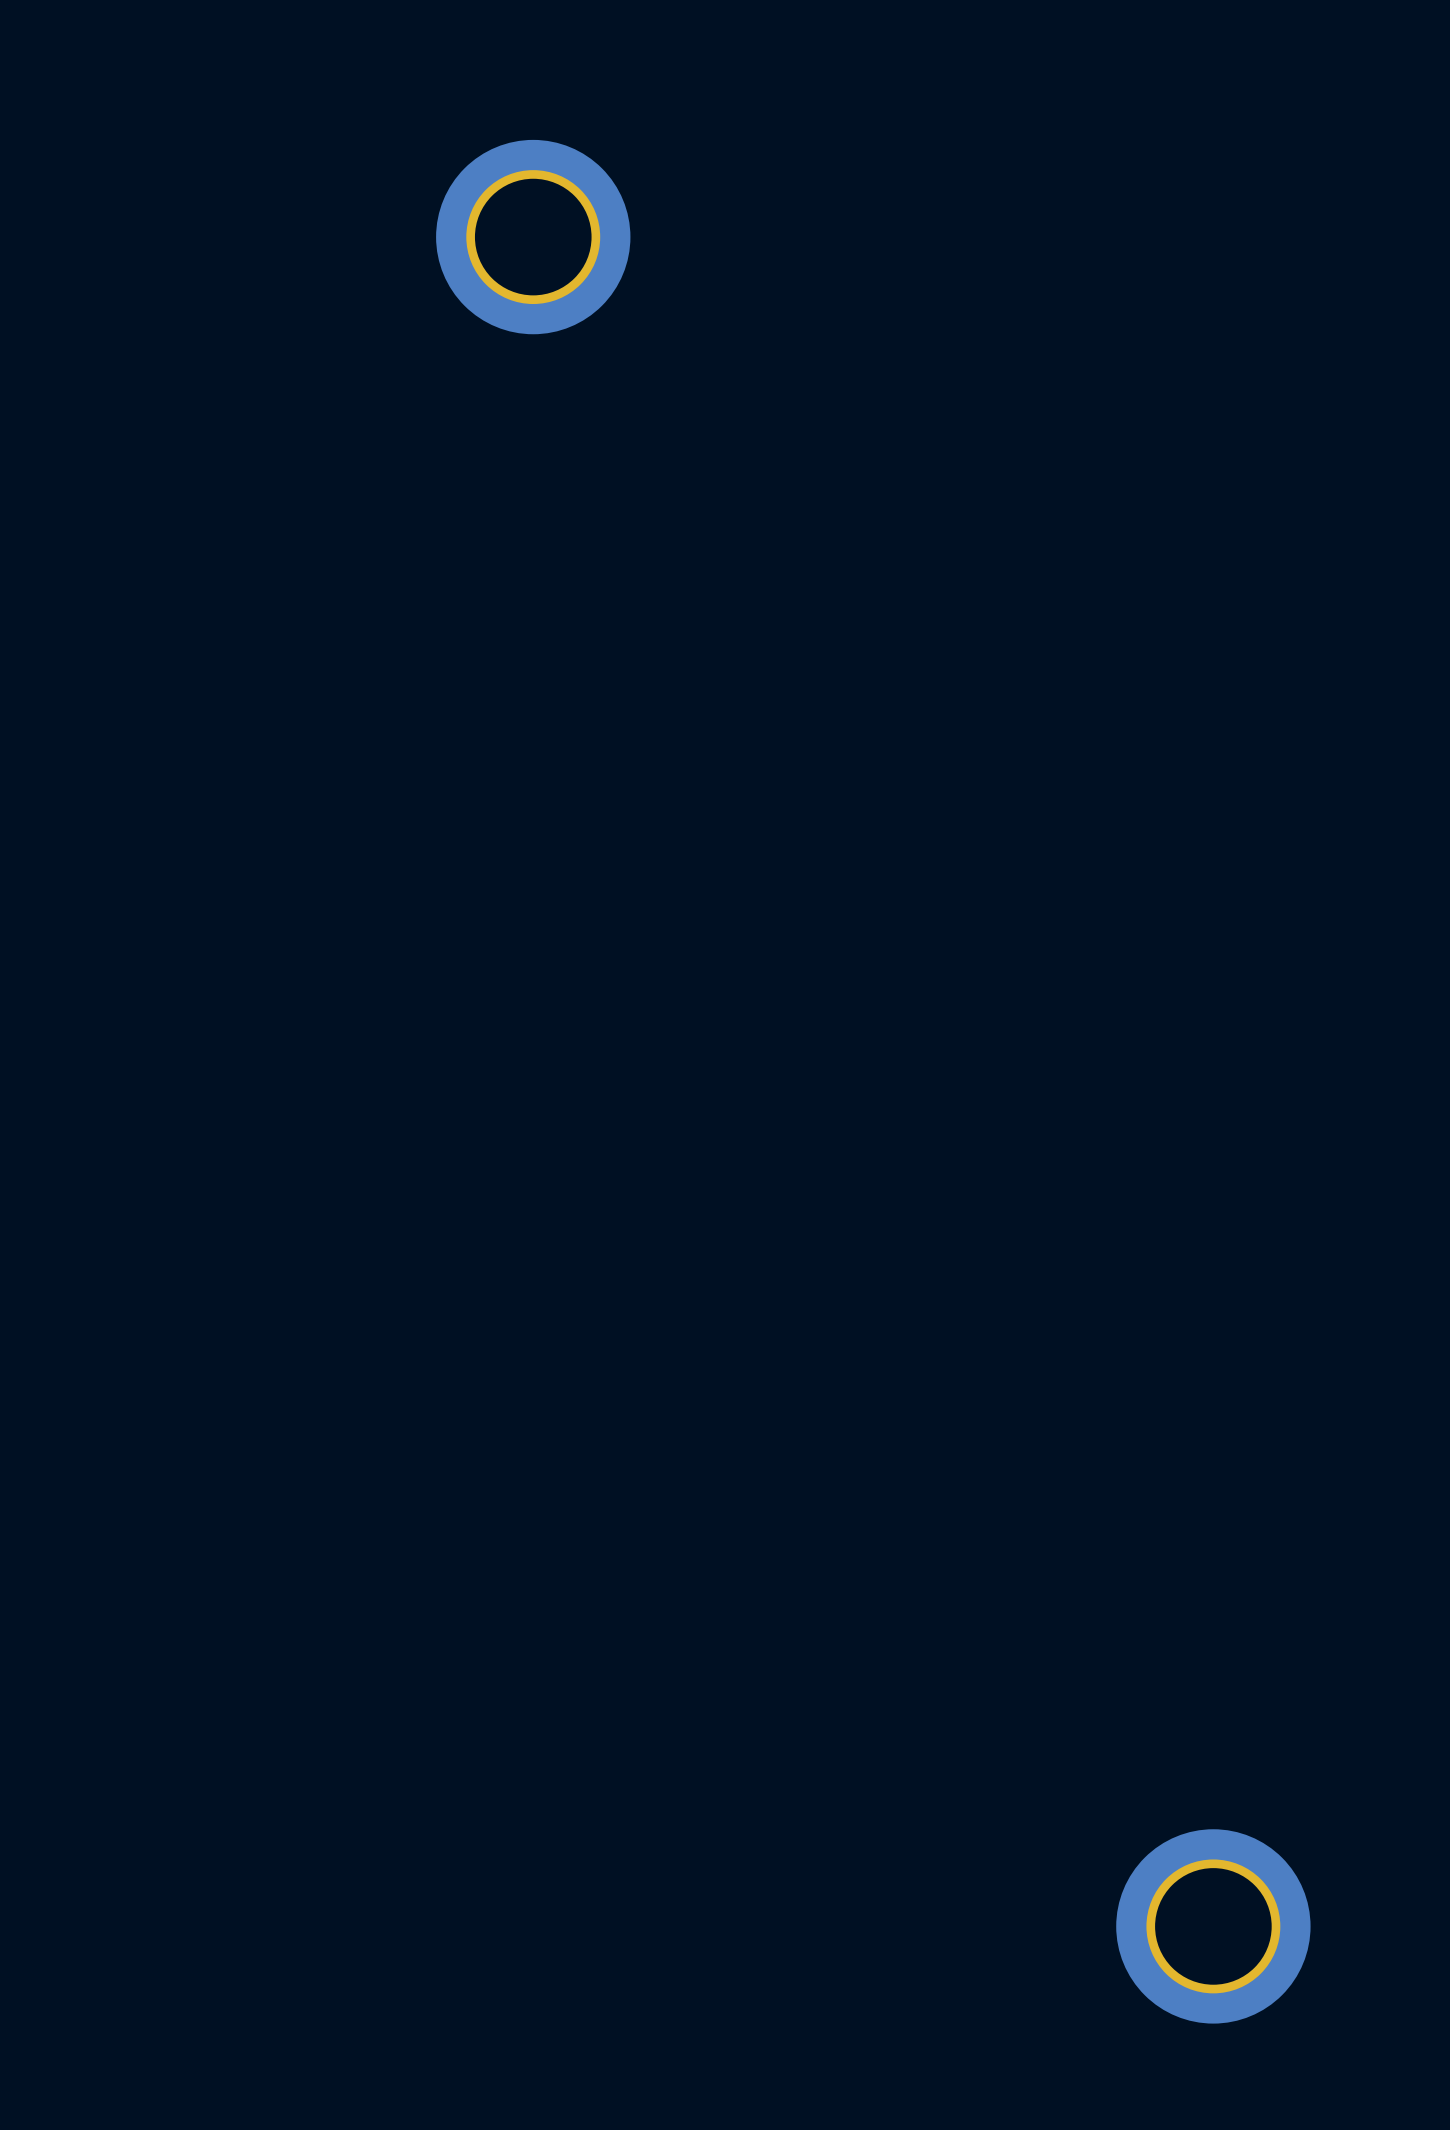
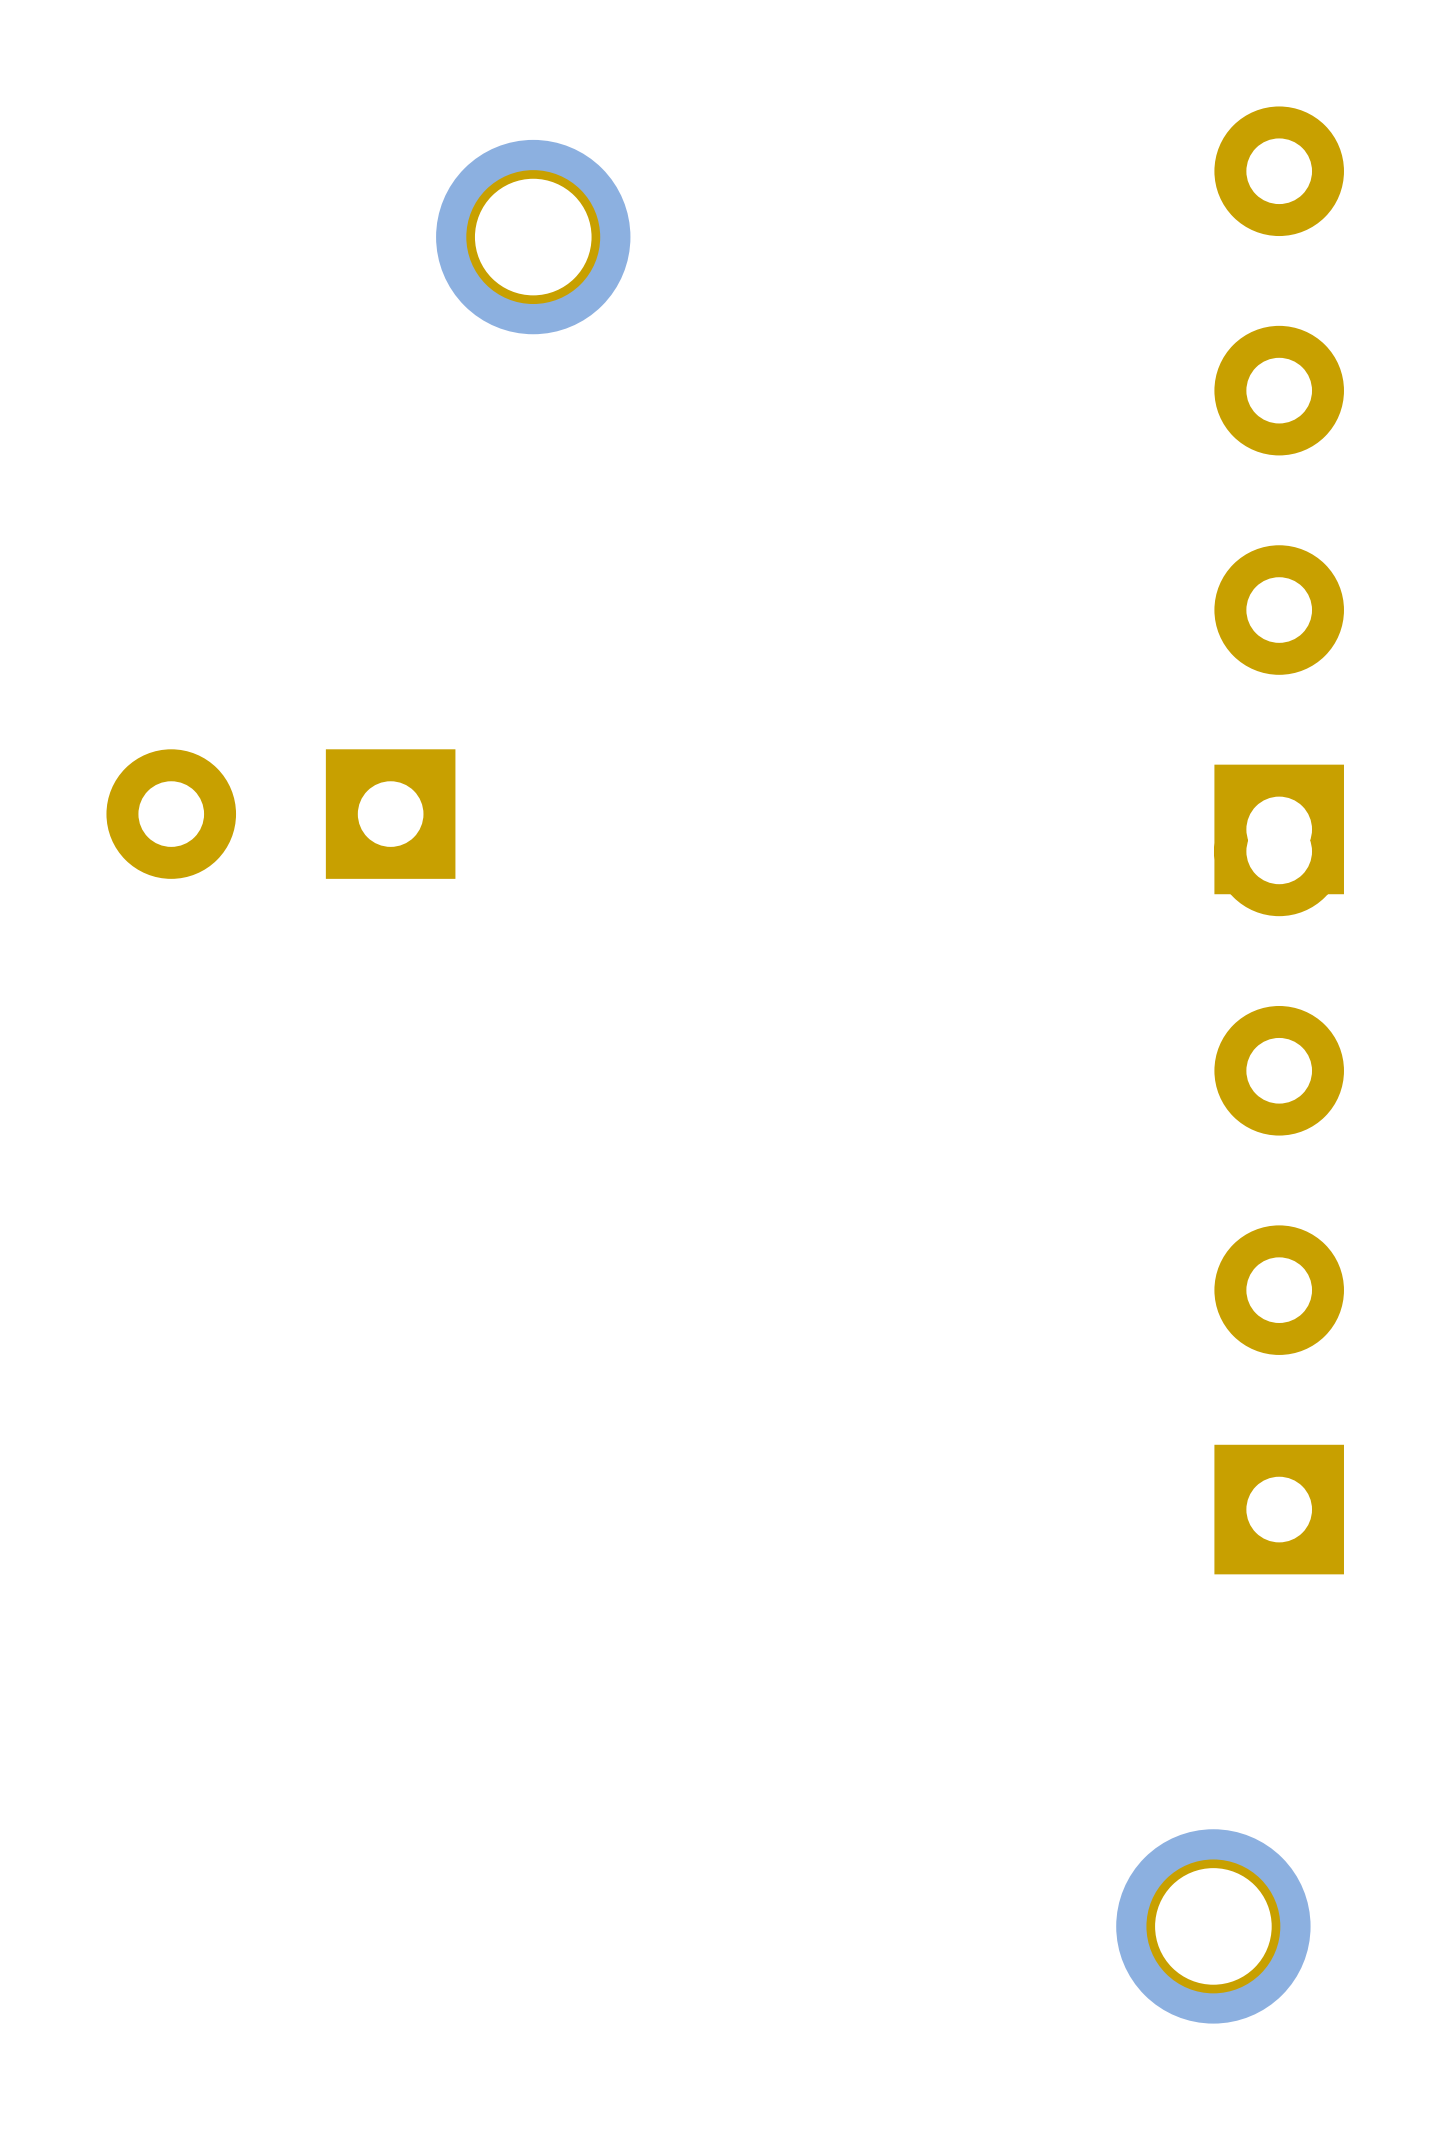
part: none -> (1279, 500)
part: none -> (280, 814)
part: none -> (1279, 1180)

